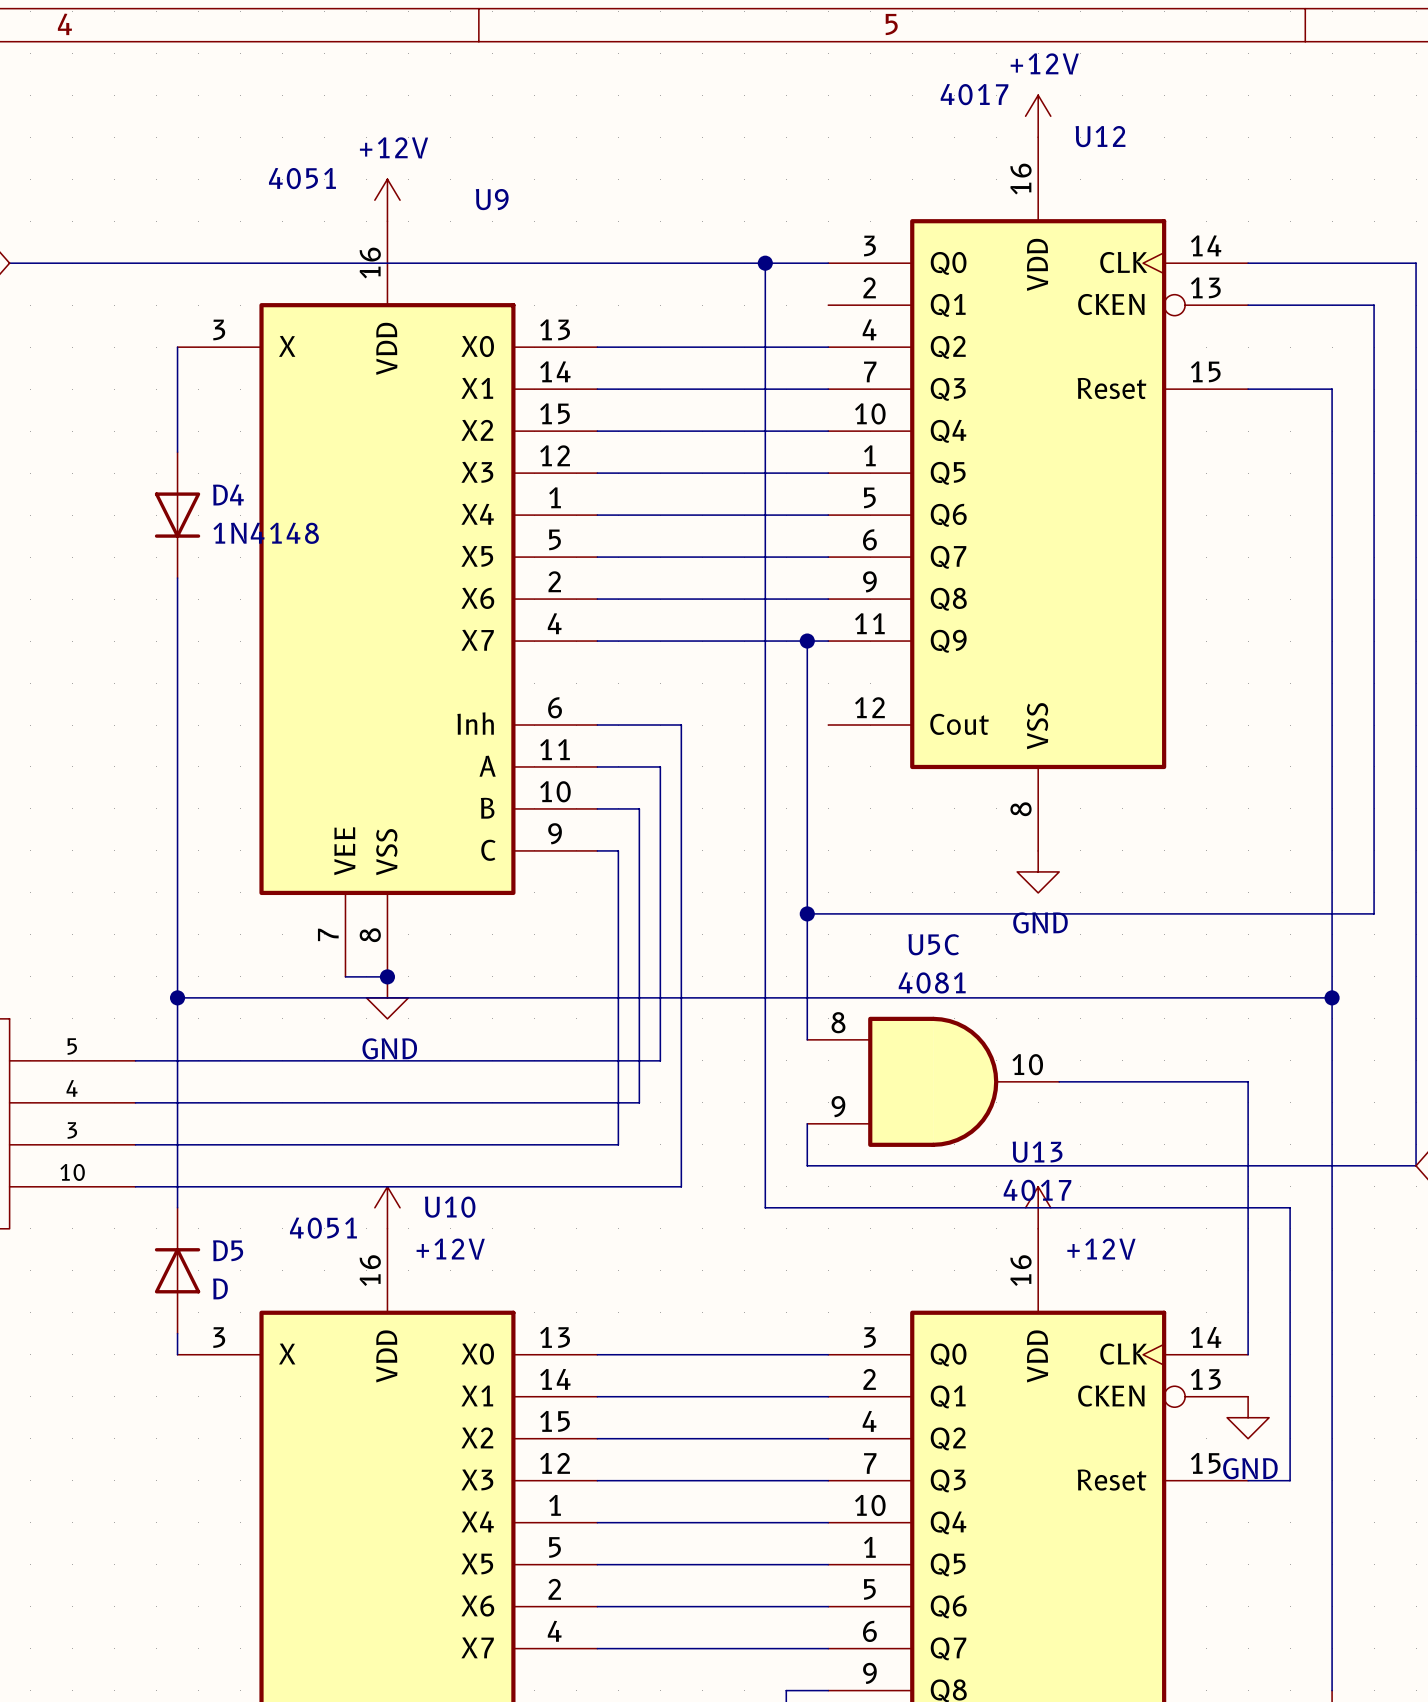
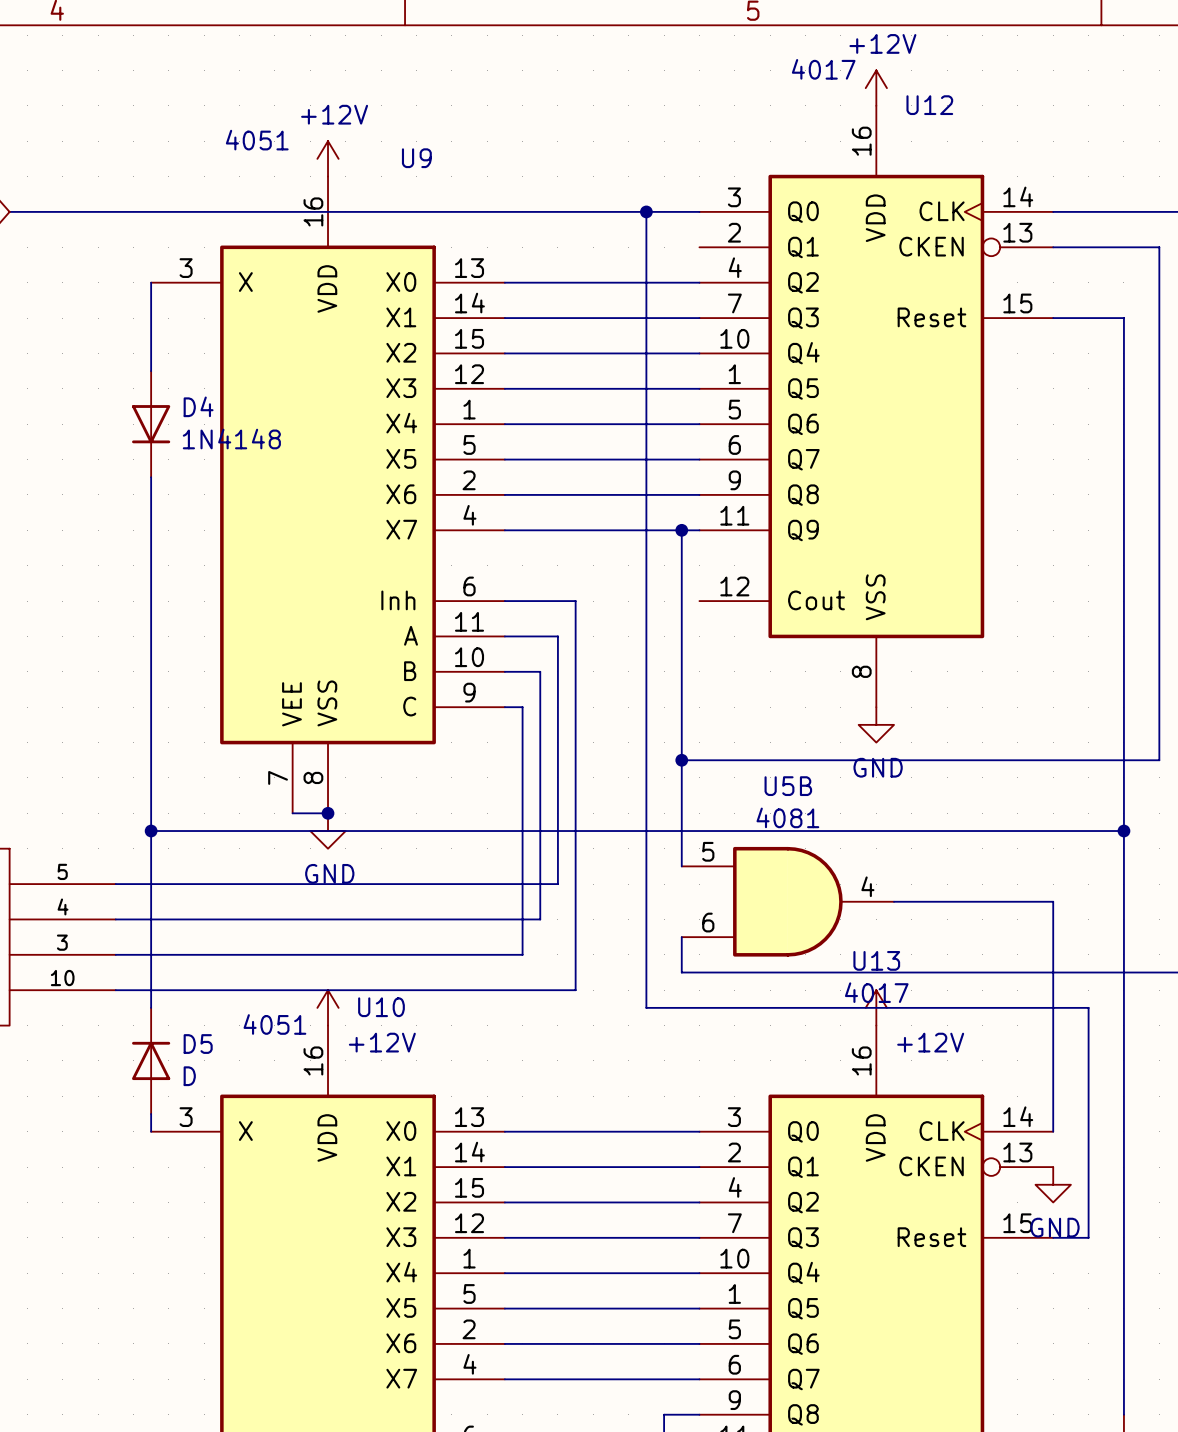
U5C name: U5C (933, 944) -> U5B (788, 786)
U5C pin number: 8 (838, 1022) -> 5 (708, 851)
U5C pin number: 10 (1027, 1064) -> 4 (867, 886)
U5C pin number: 9 (838, 1106) -> 6 (708, 922)

